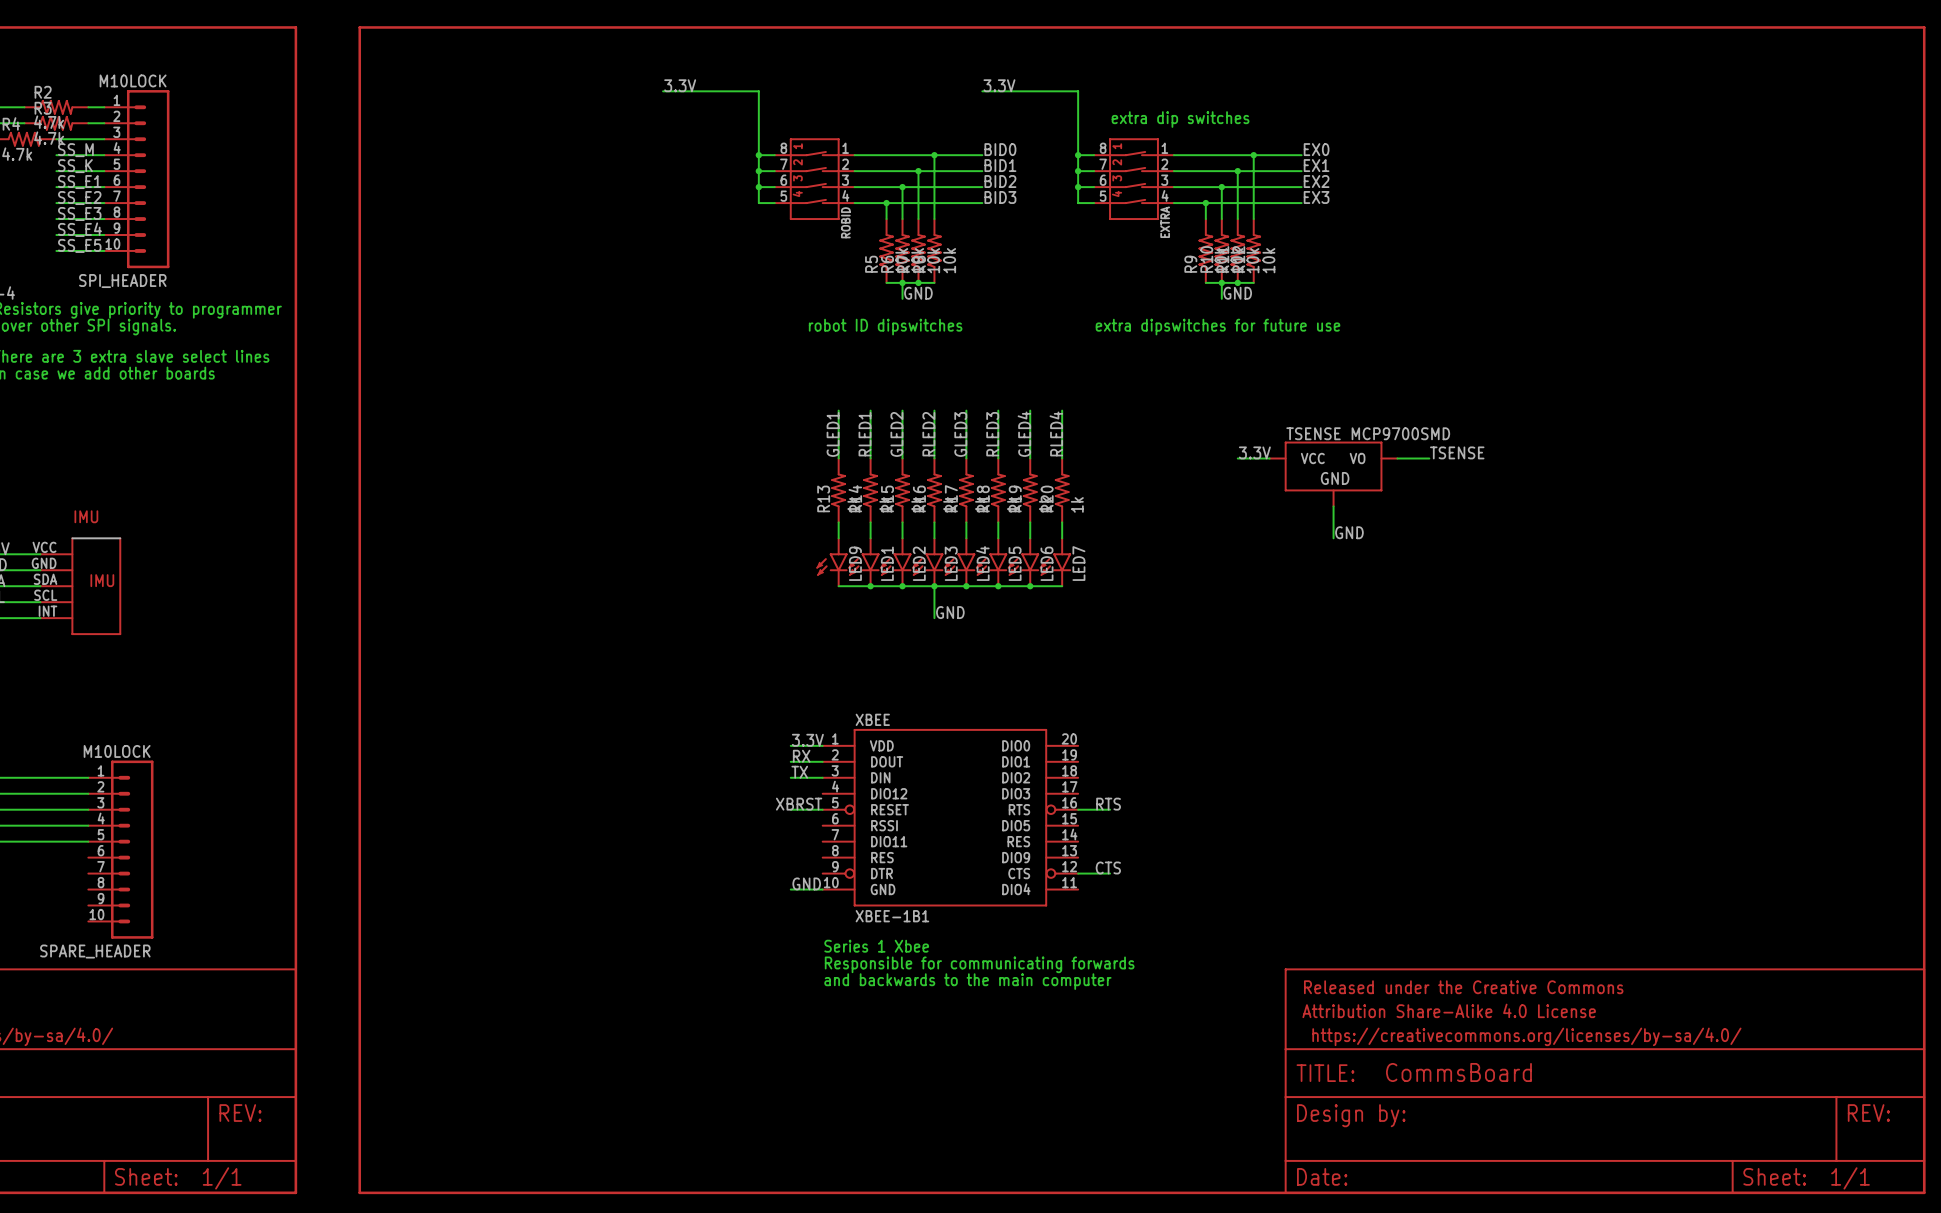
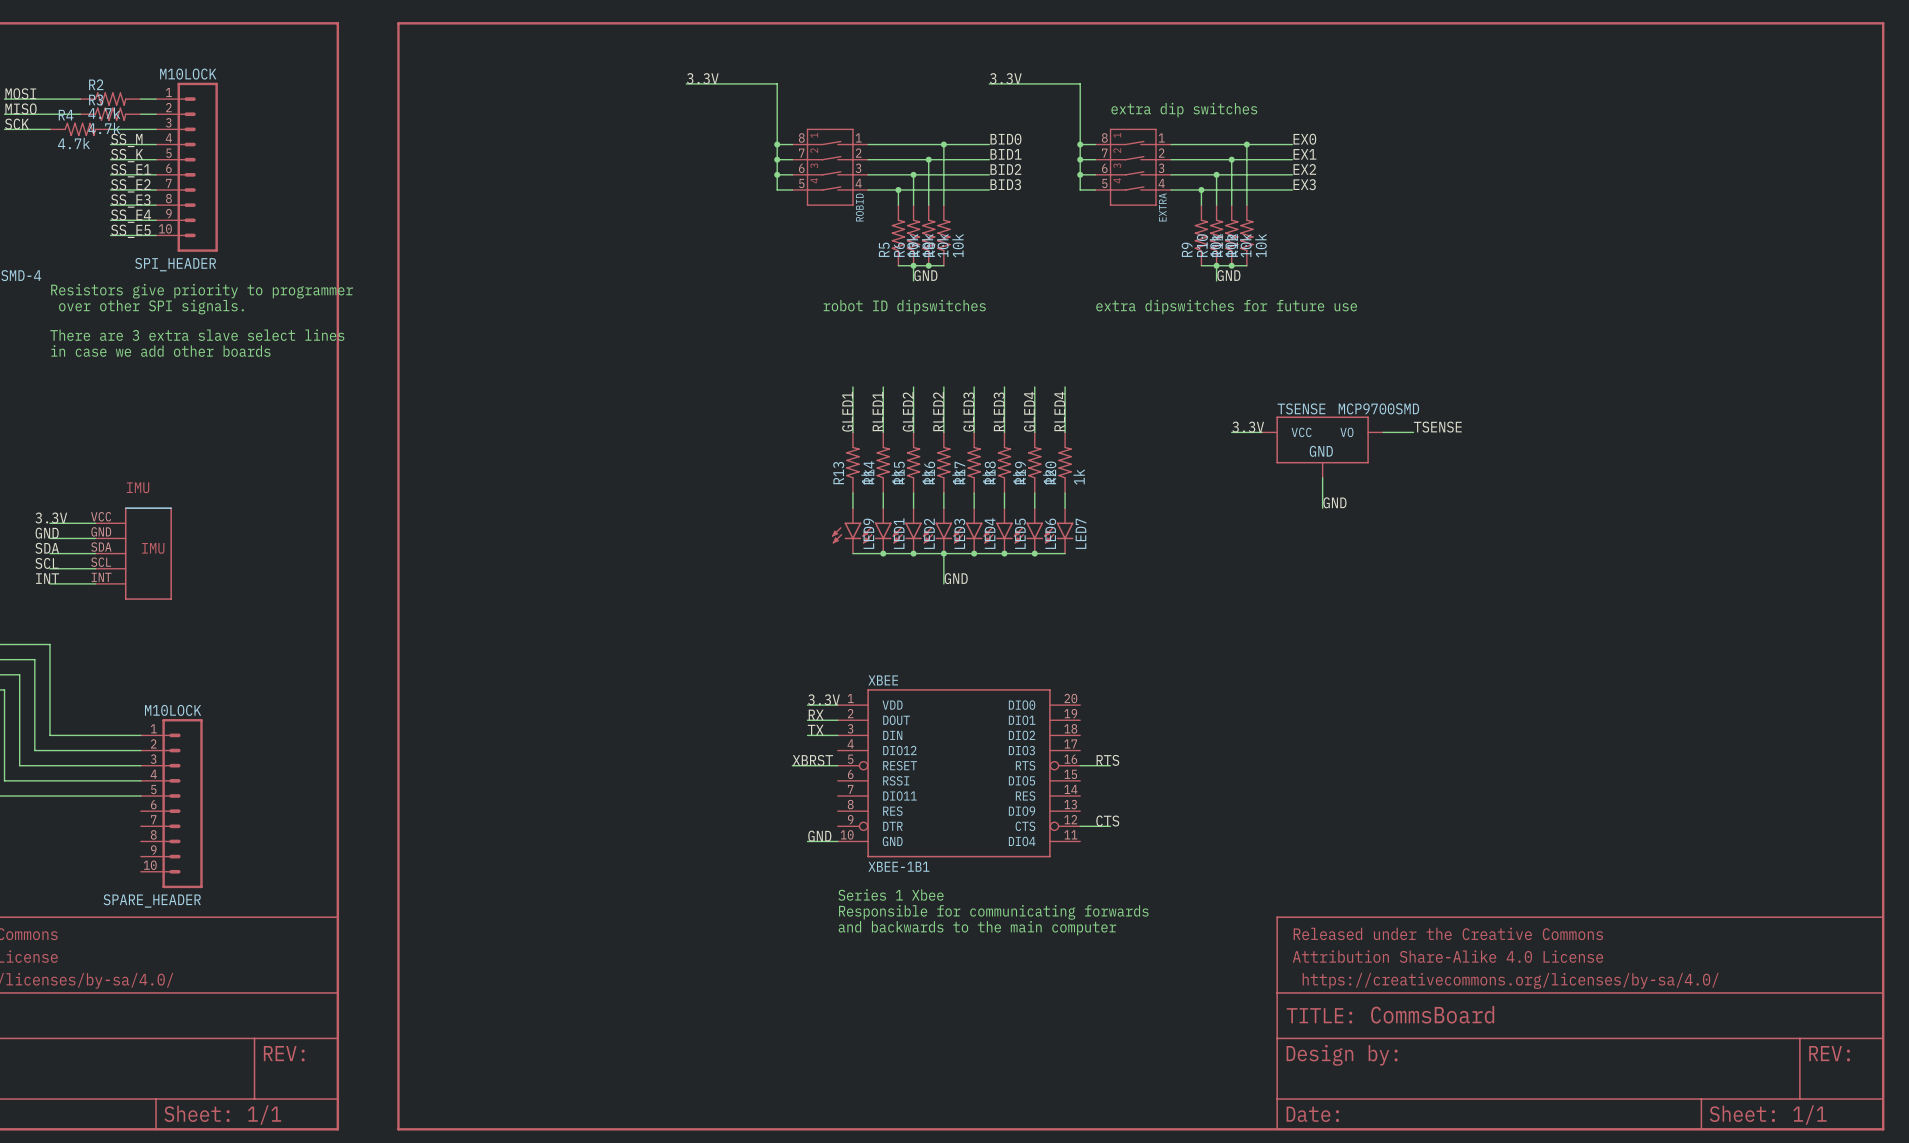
wire: none -> (792, 765) (807, 765)

